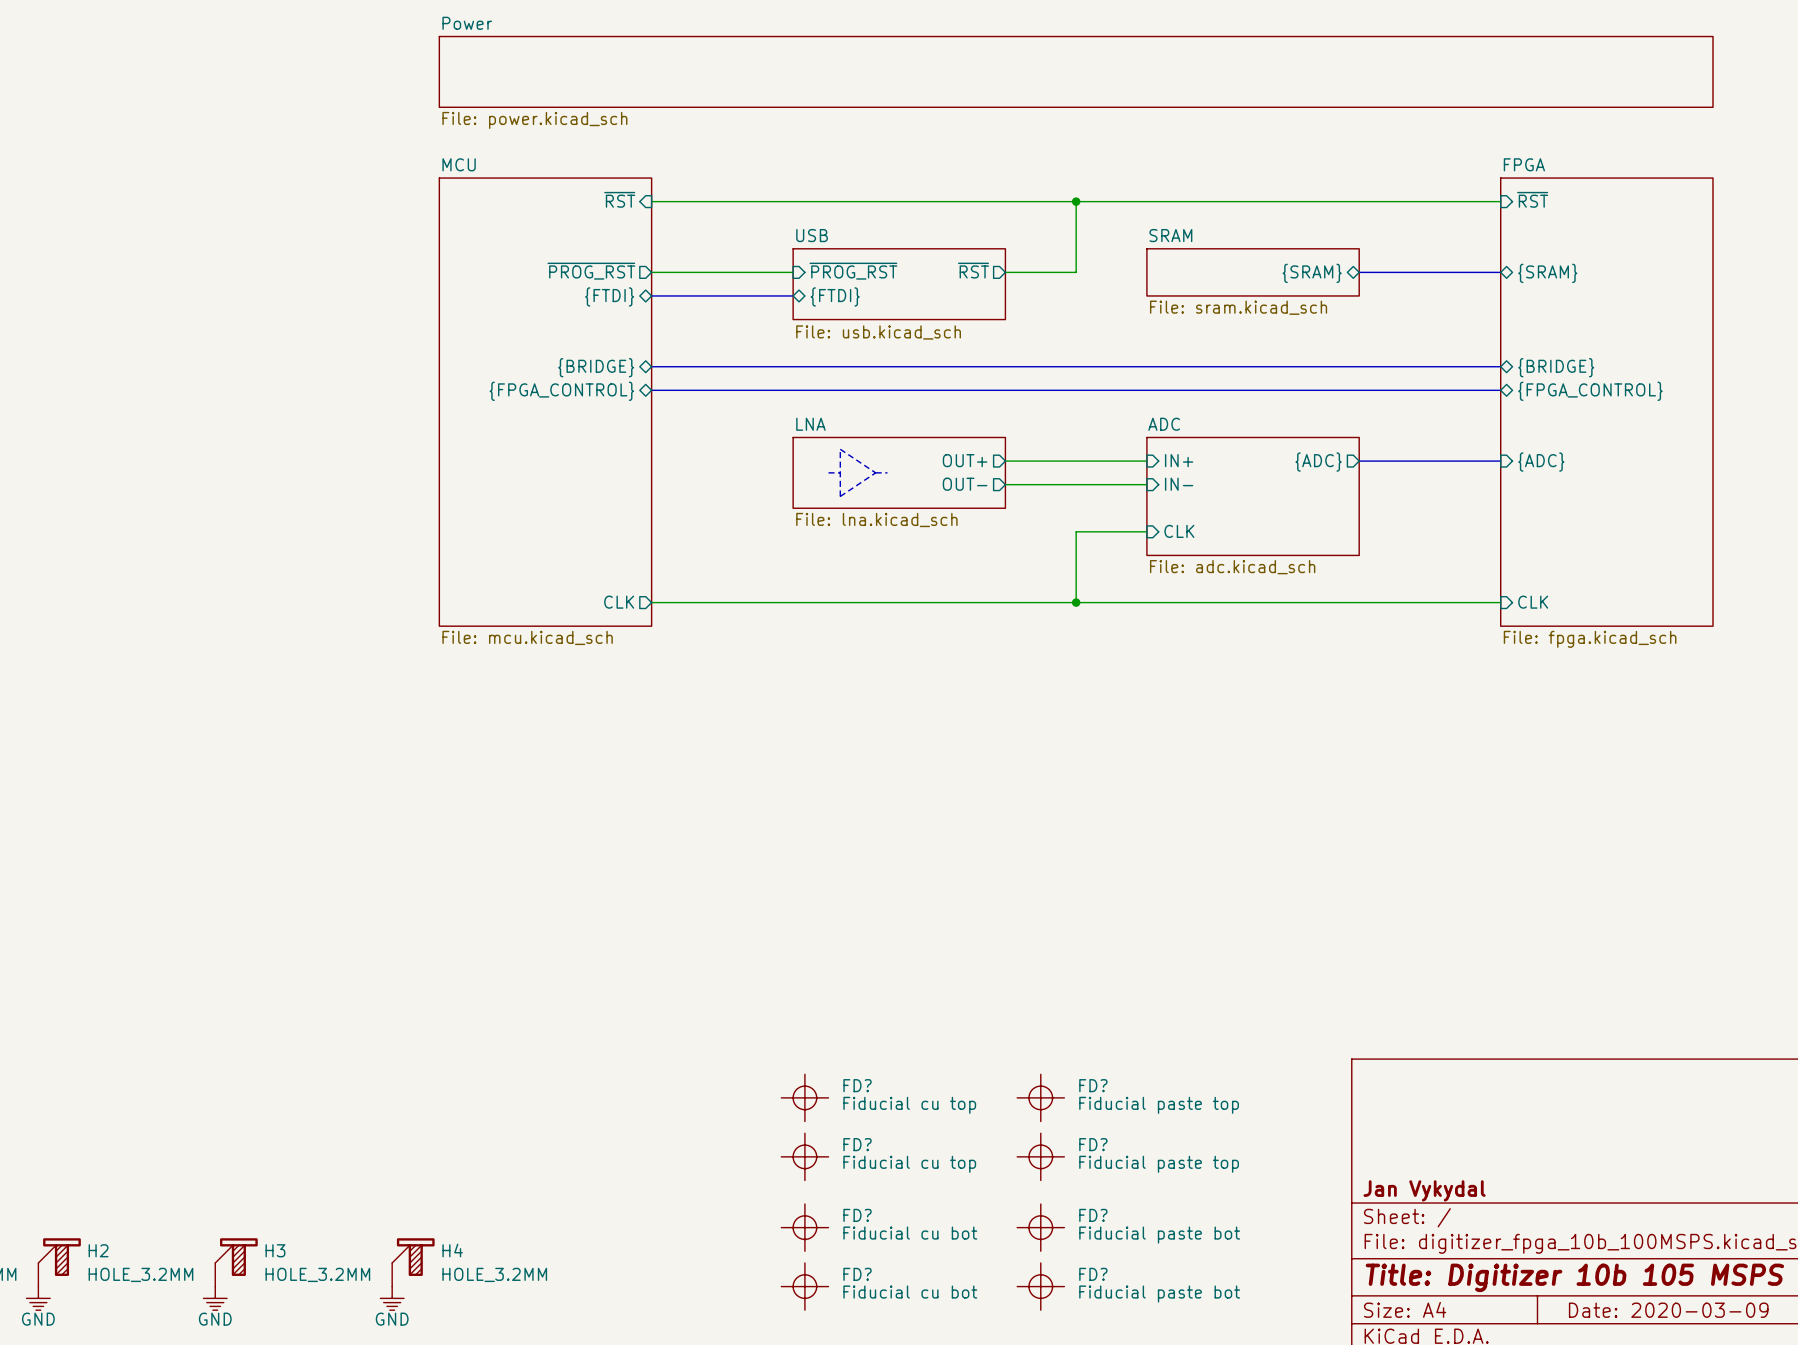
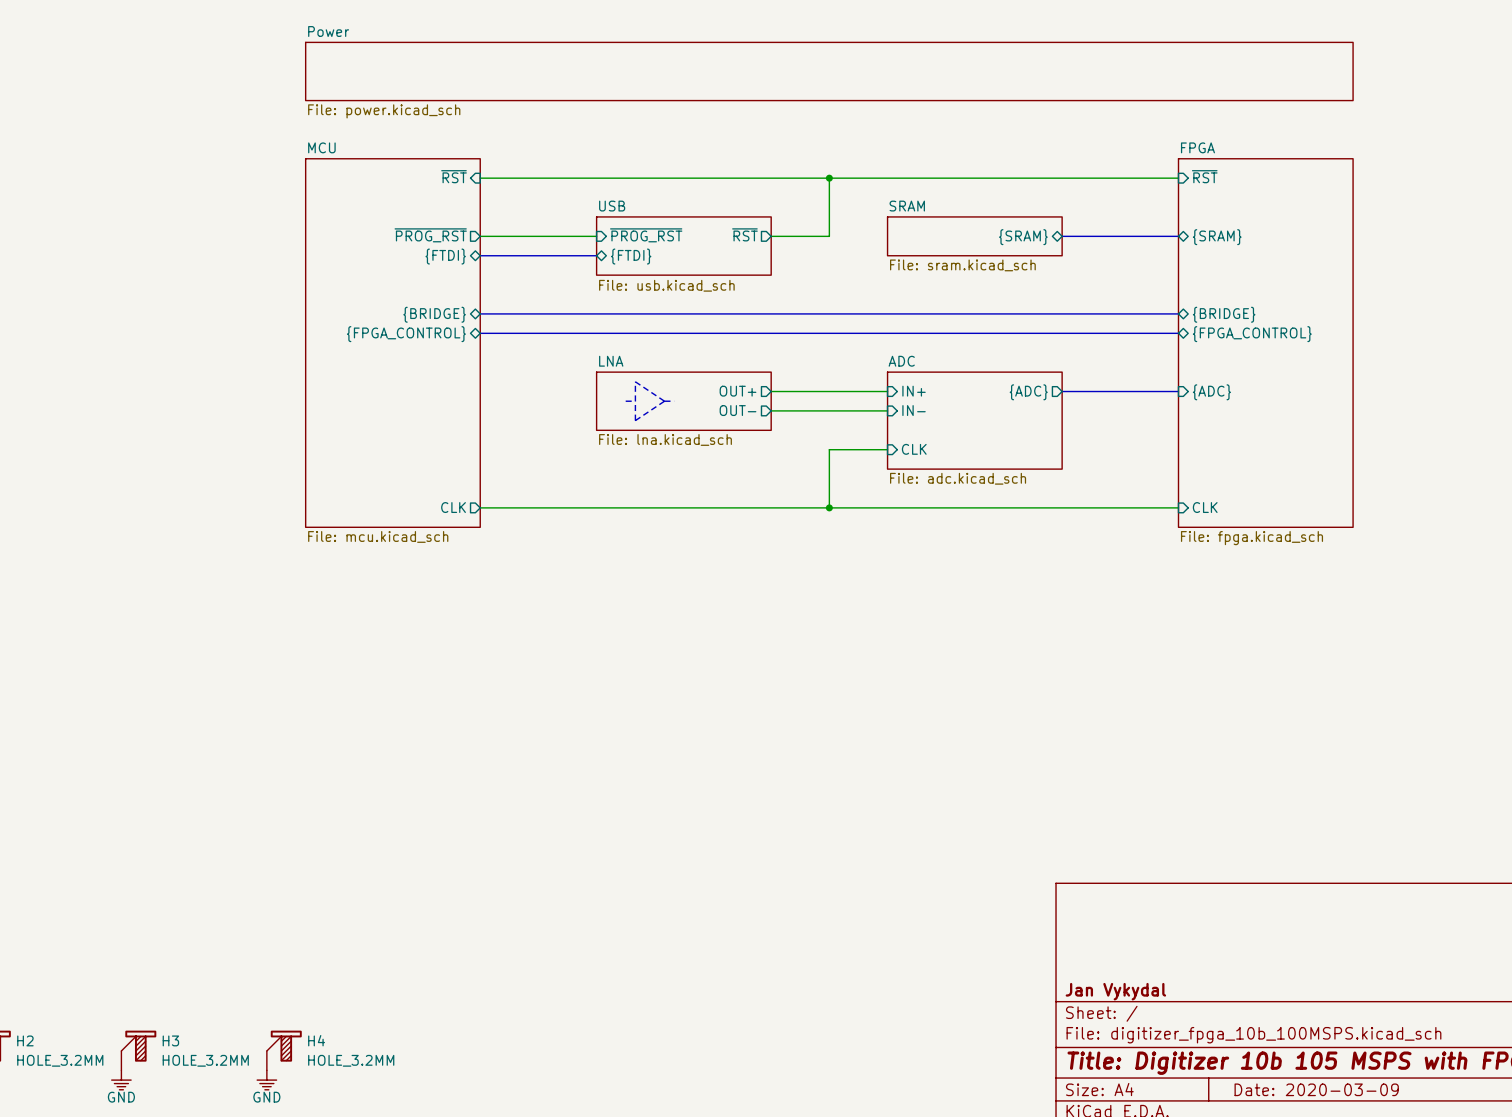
FD?: Fiducial cu top (804, 1097) -> none
FD?: Fiducial paste top (1040, 1097) -> none
FD?: Fiducial cu top (804, 1156) -> none
FD?: Fiducial paste top (1040, 1156) -> none
FD?: Fiducial cu bot (804, 1227) -> none
FD?: Fiducial paste bot (1040, 1227) -> none
FD?: Fiducial cu bot (804, 1286) -> none
FD?: Fiducial paste bot (1040, 1286) -> none

